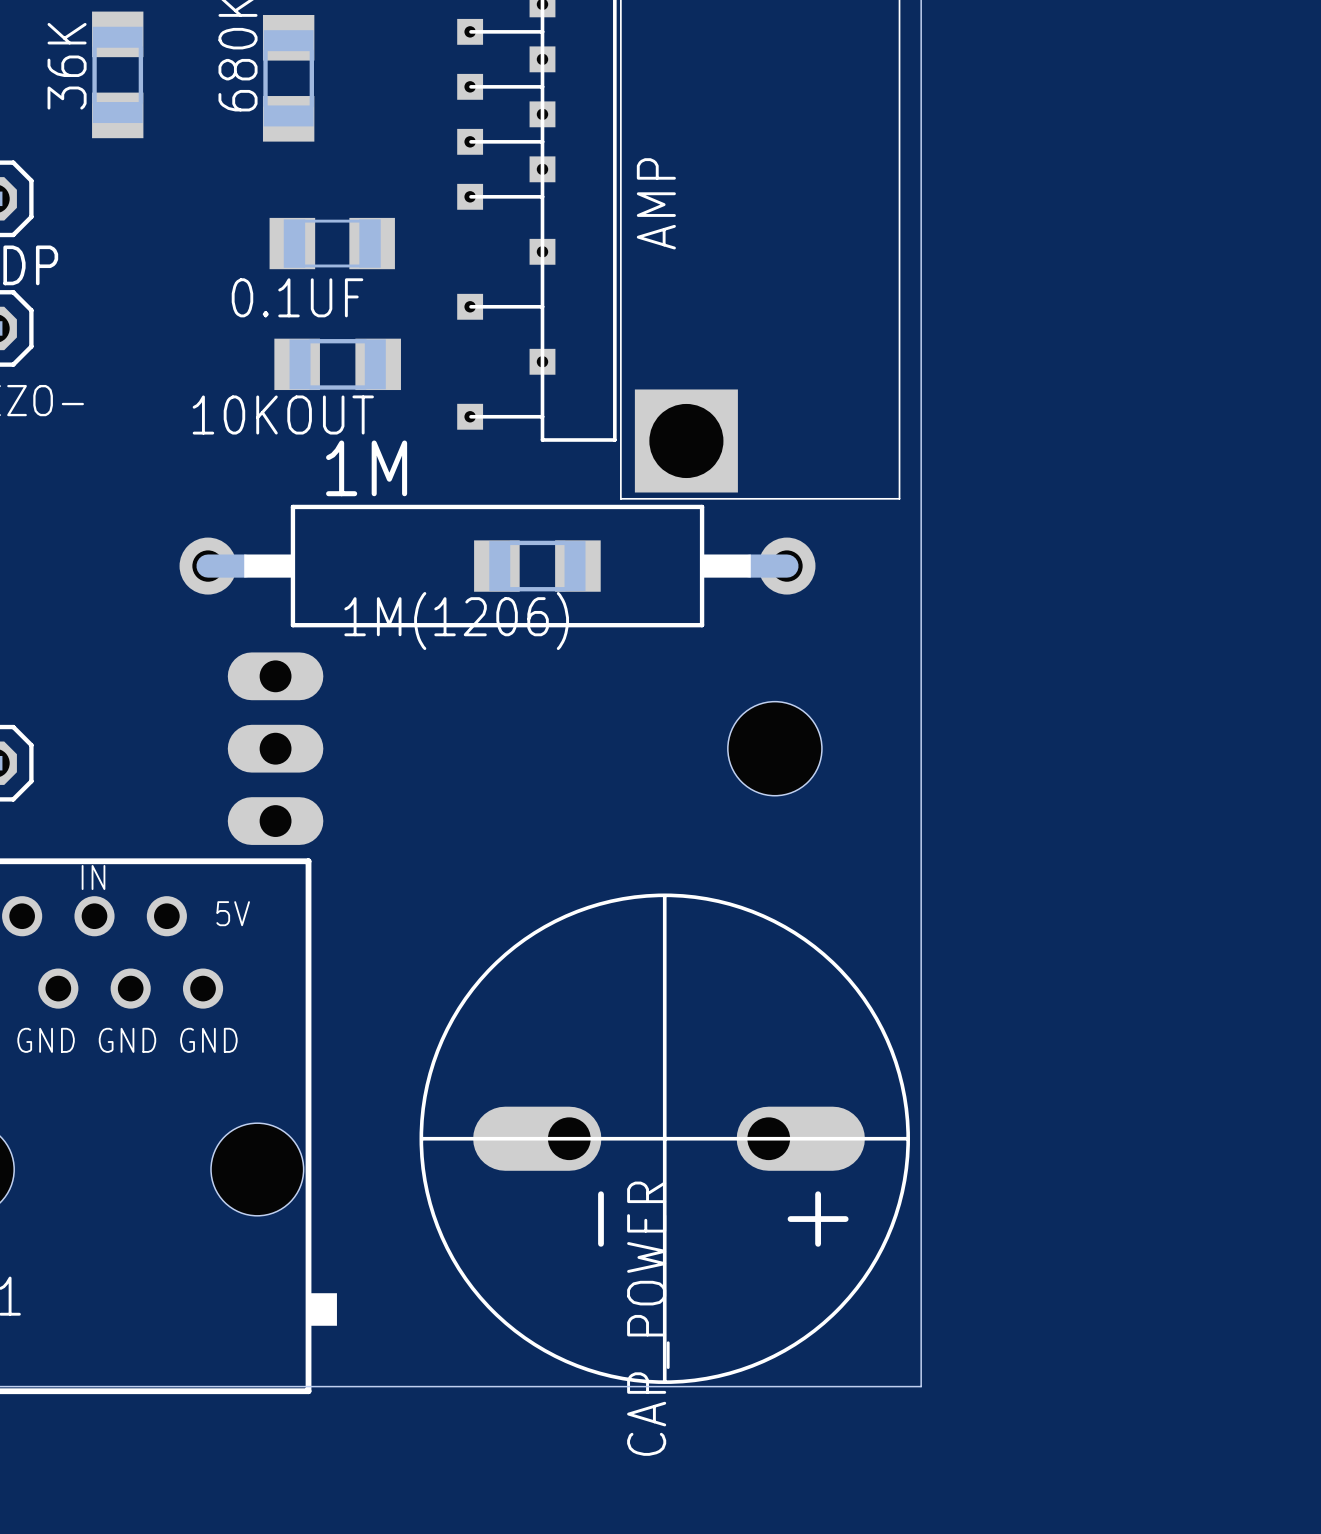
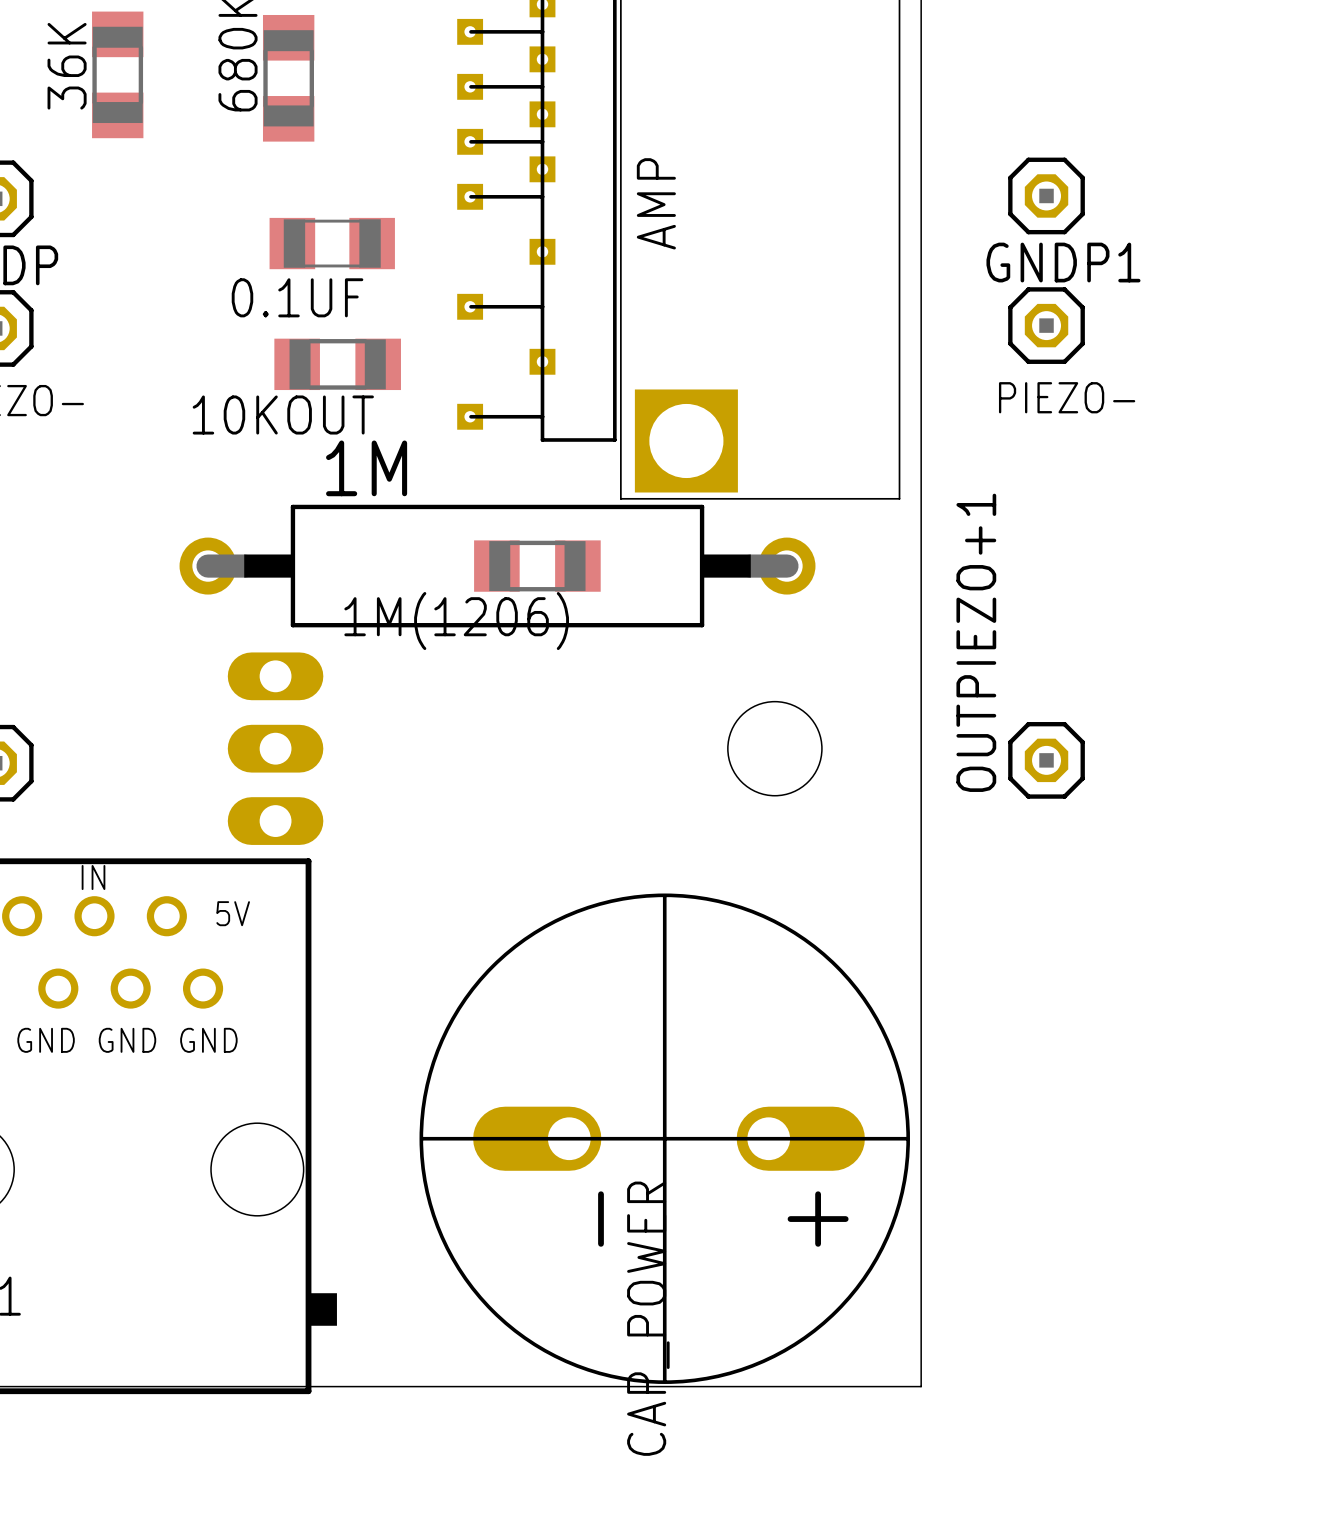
GNDP1: none -> (1046, 195)
part: none -> (1046, 325)
text: none -> PIEZO- (1067, 397)
OUTPIEZO+1: none -> (1046, 760)

